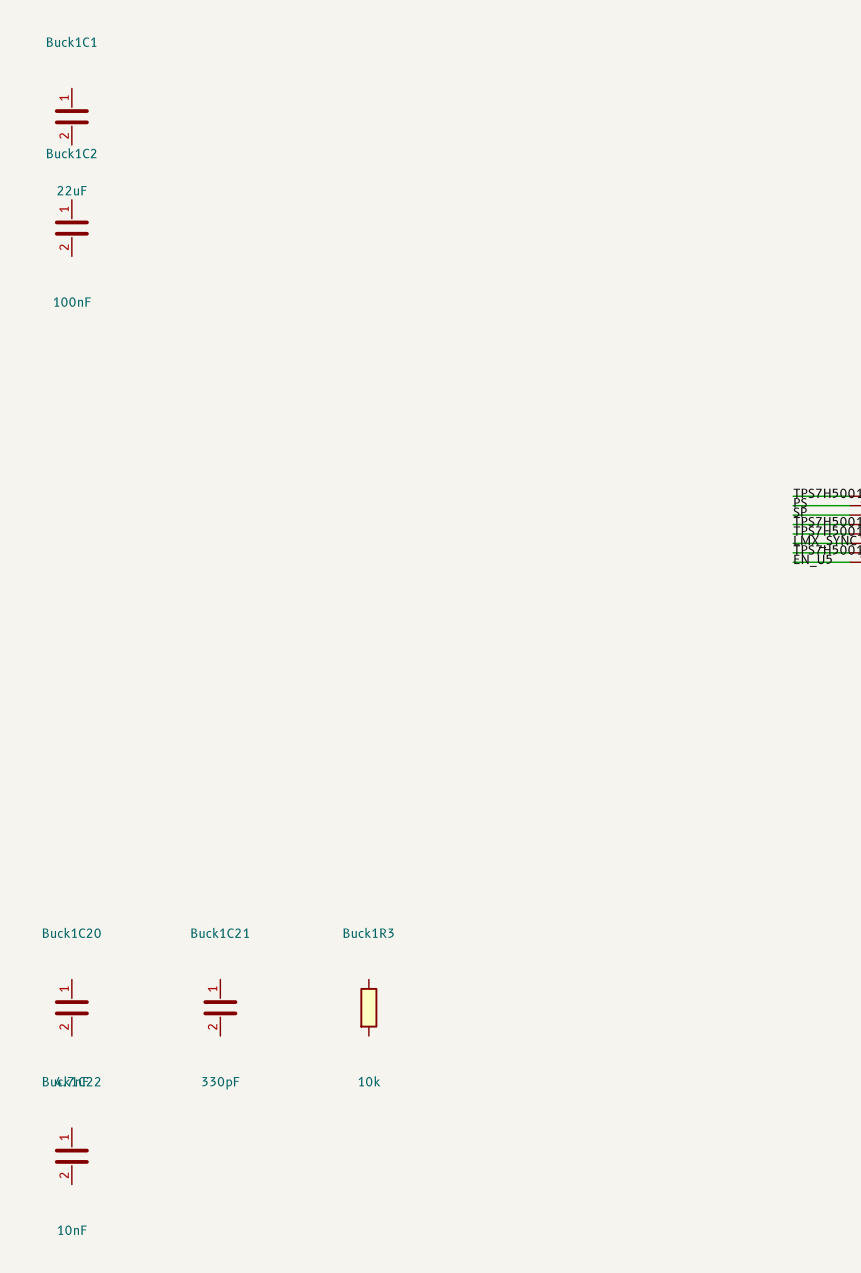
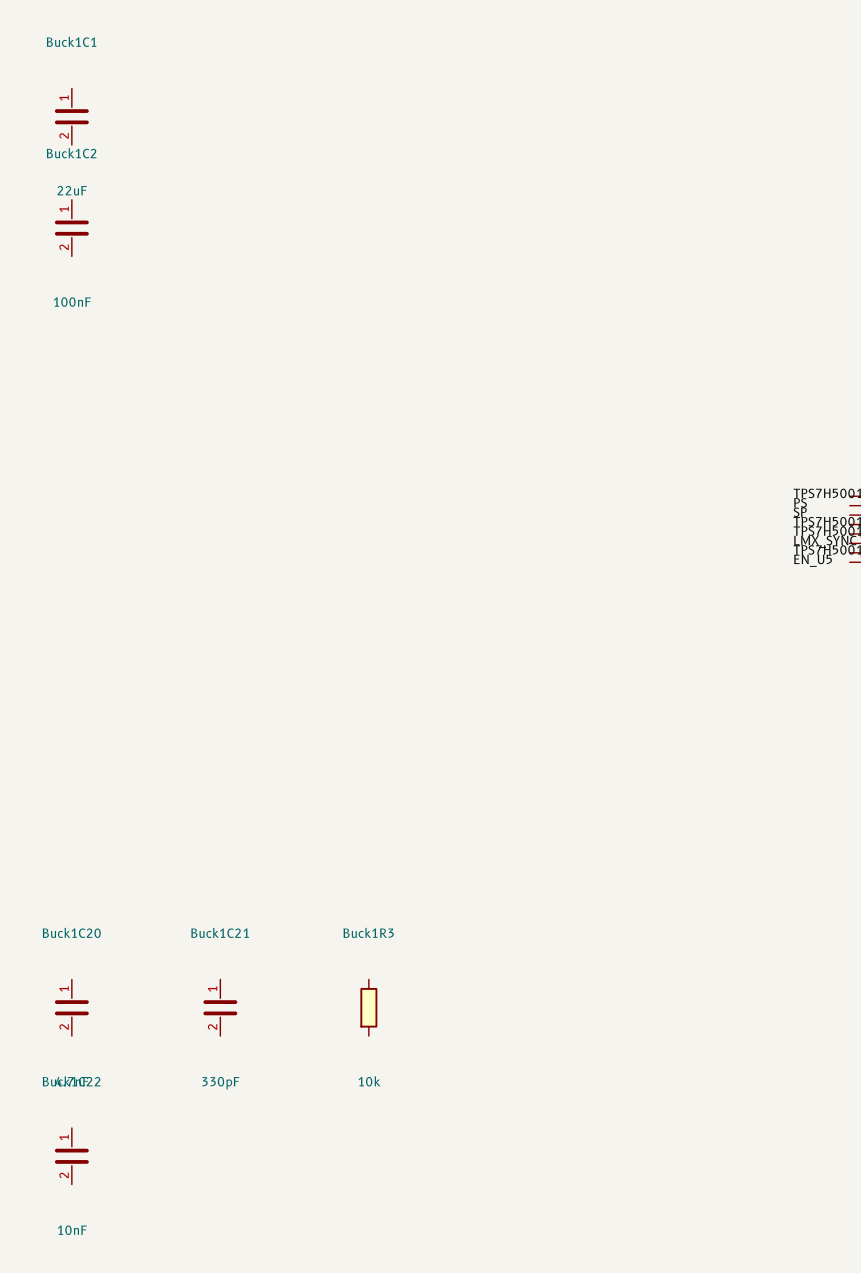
wire: (793, 496) (849, 496) -> none
wire: (793, 505) (849, 505) -> none
wire: (793, 515) (849, 515) -> none
wire: (793, 524) (849, 524) -> none
wire: (793, 533) (849, 533) -> none
wire: (793, 543) (849, 543) -> none
wire: (793, 552) (849, 552) -> none
wire: (793, 562) (849, 562) -> none

